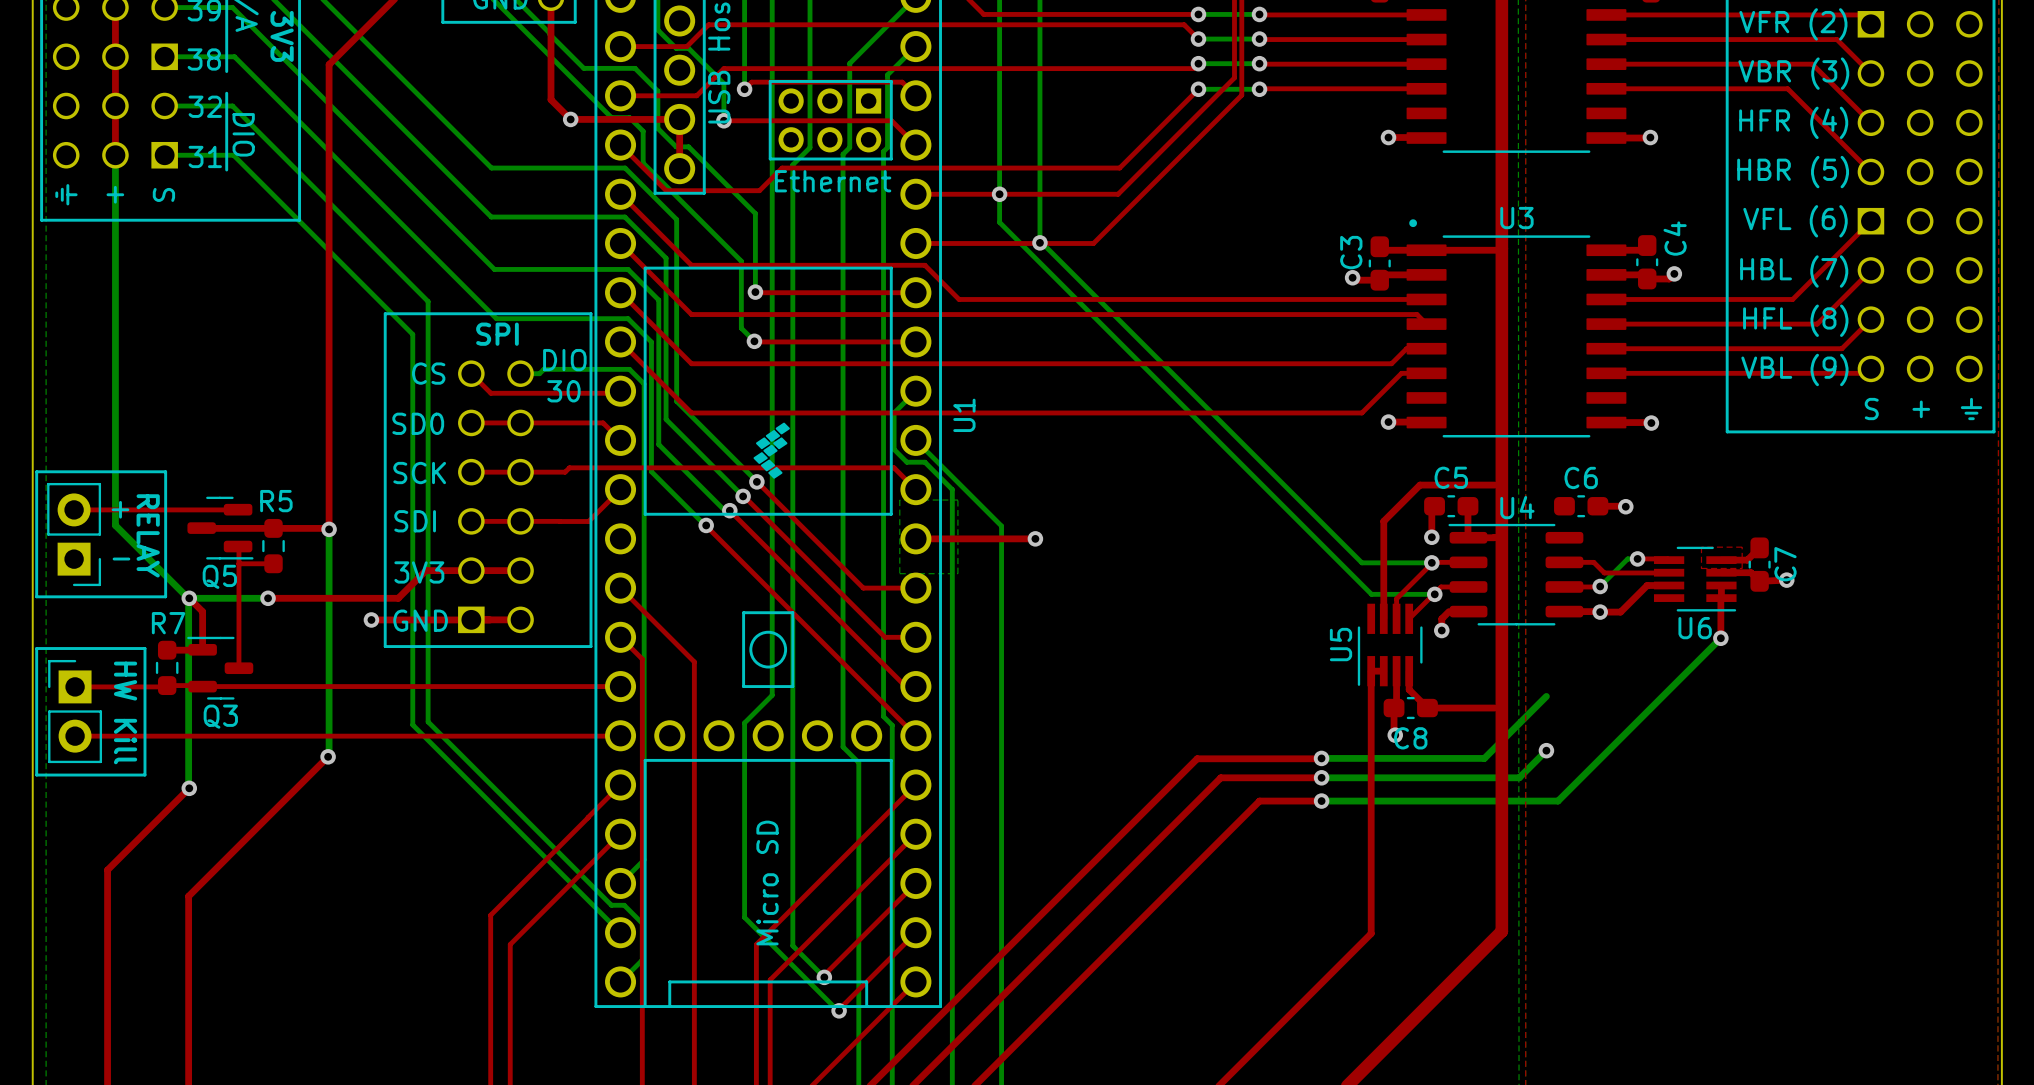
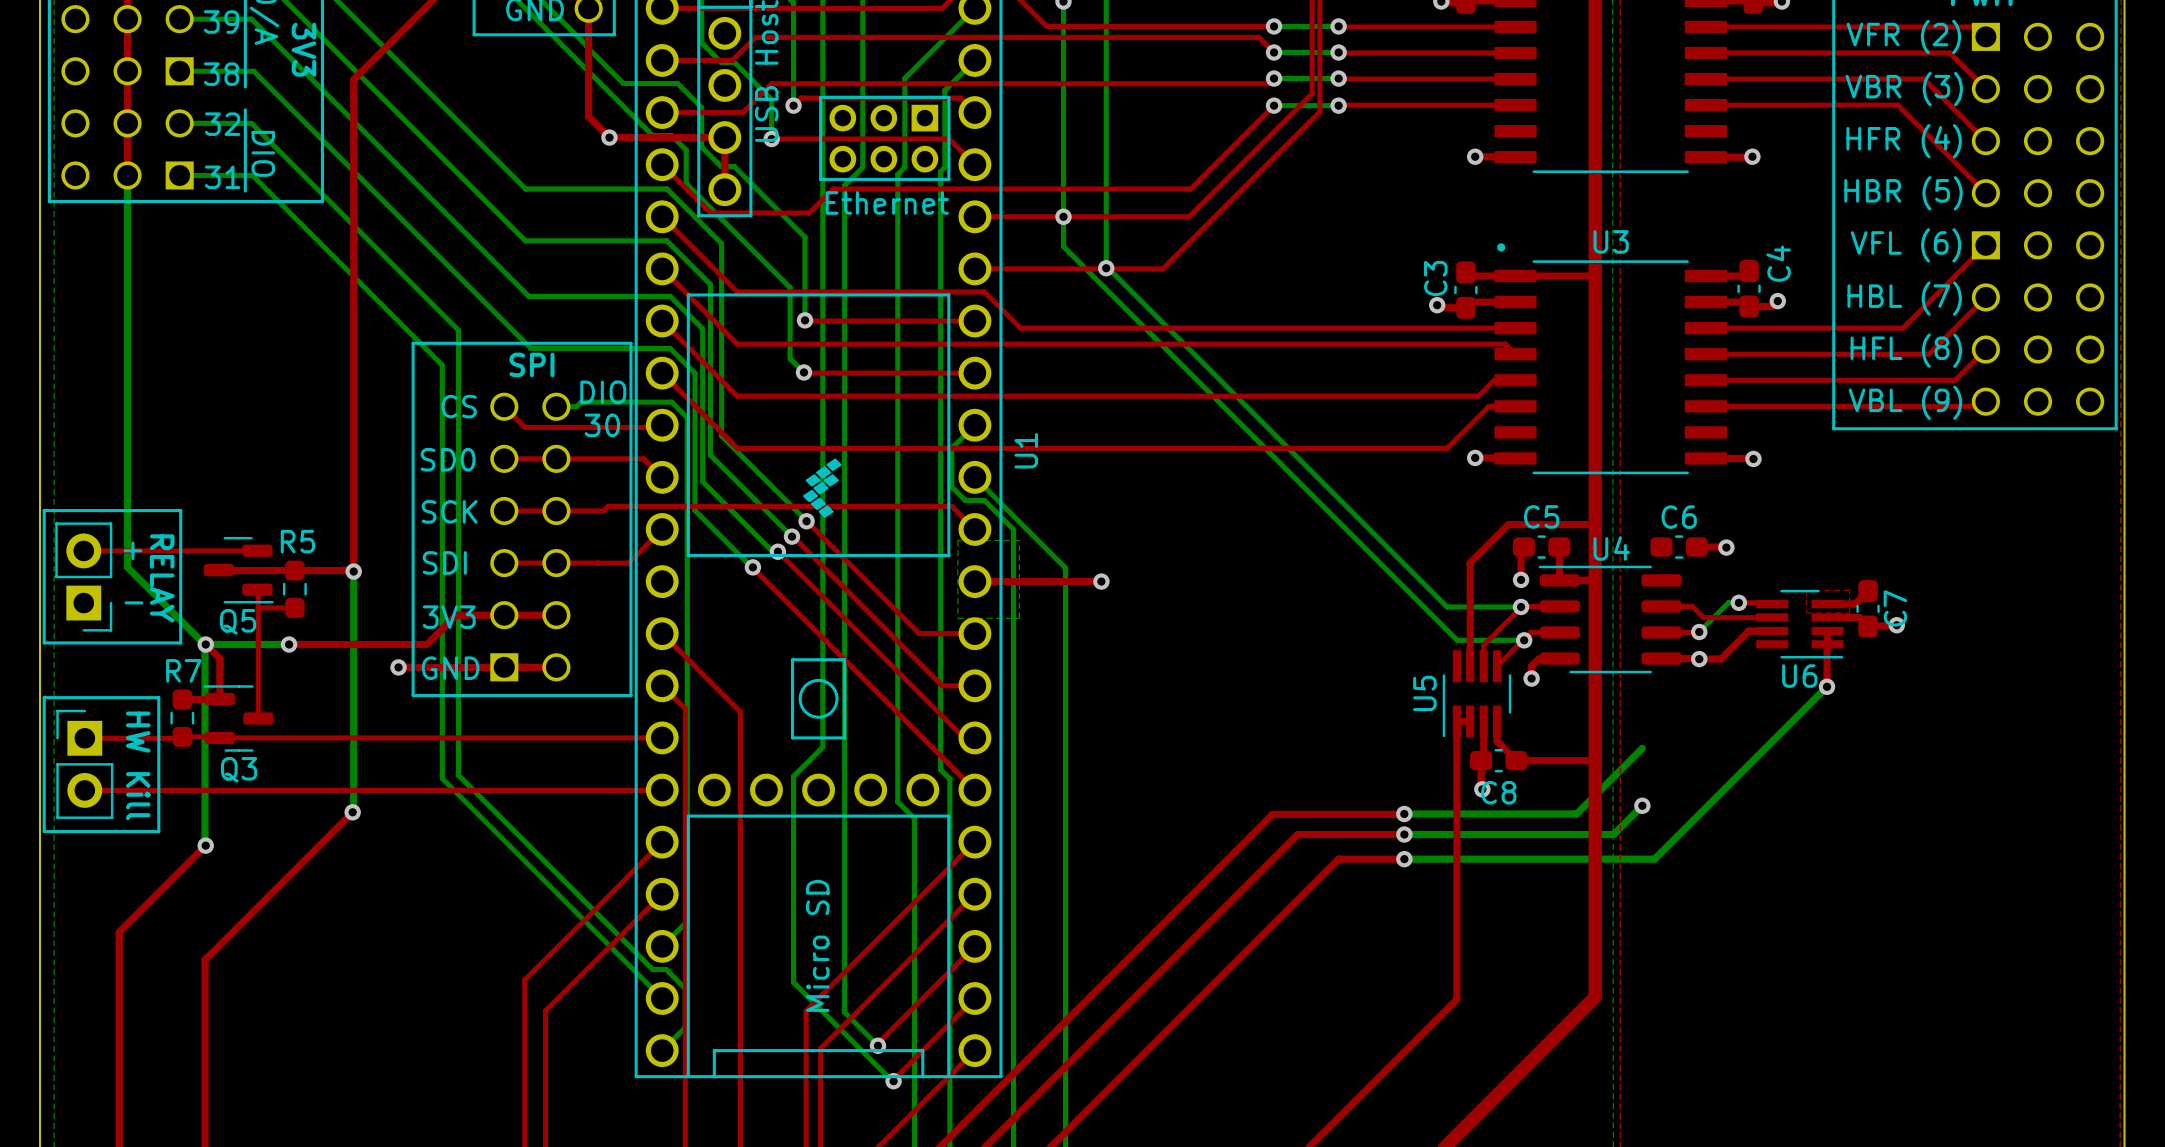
line: (41, 179) (41, 220) (299, 220) (299, 179) -> (49, 201) (322, 201)
text: ⏚ (66, 194) -> none
text: + (115, 194) -> none
text: S (163, 194) -> none
line: (1727, 394) (1727, 431) (1994, 431) (1994, 394) -> (1833, 428) (2116, 428)
text: S (1871, 409) -> none
text: + (1921, 409) -> none
text: ⏚ (1971, 409) -> none

